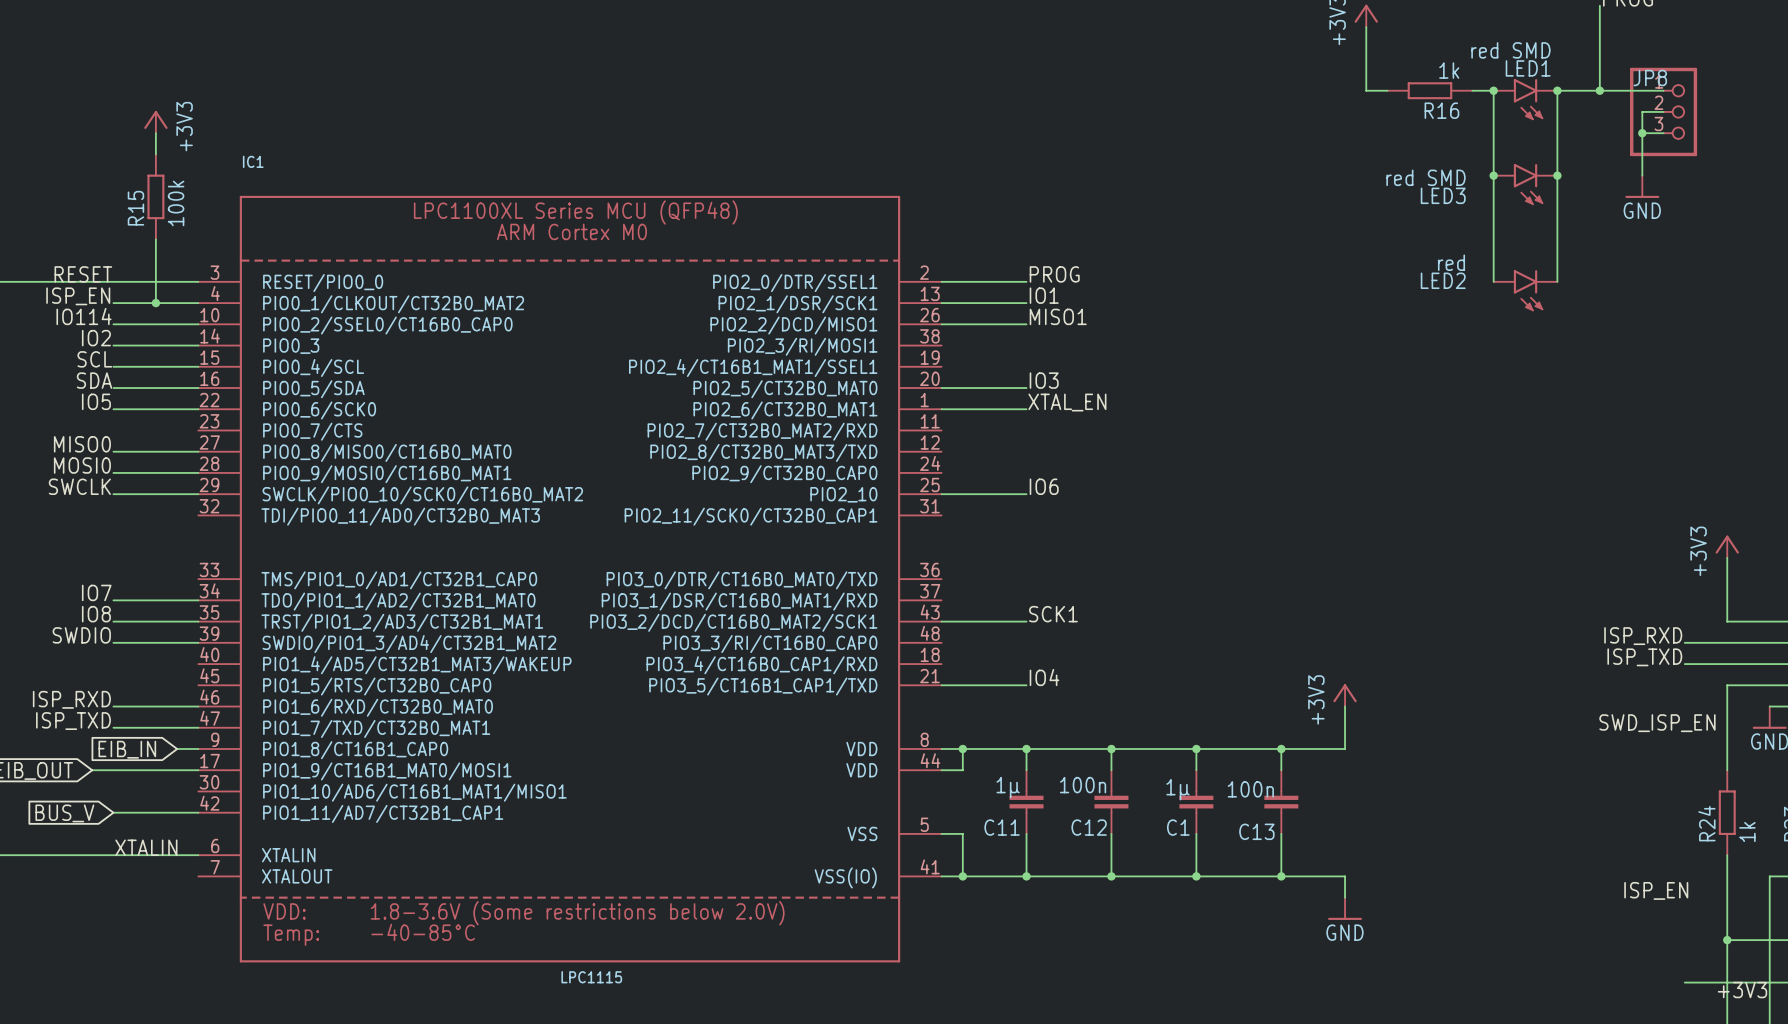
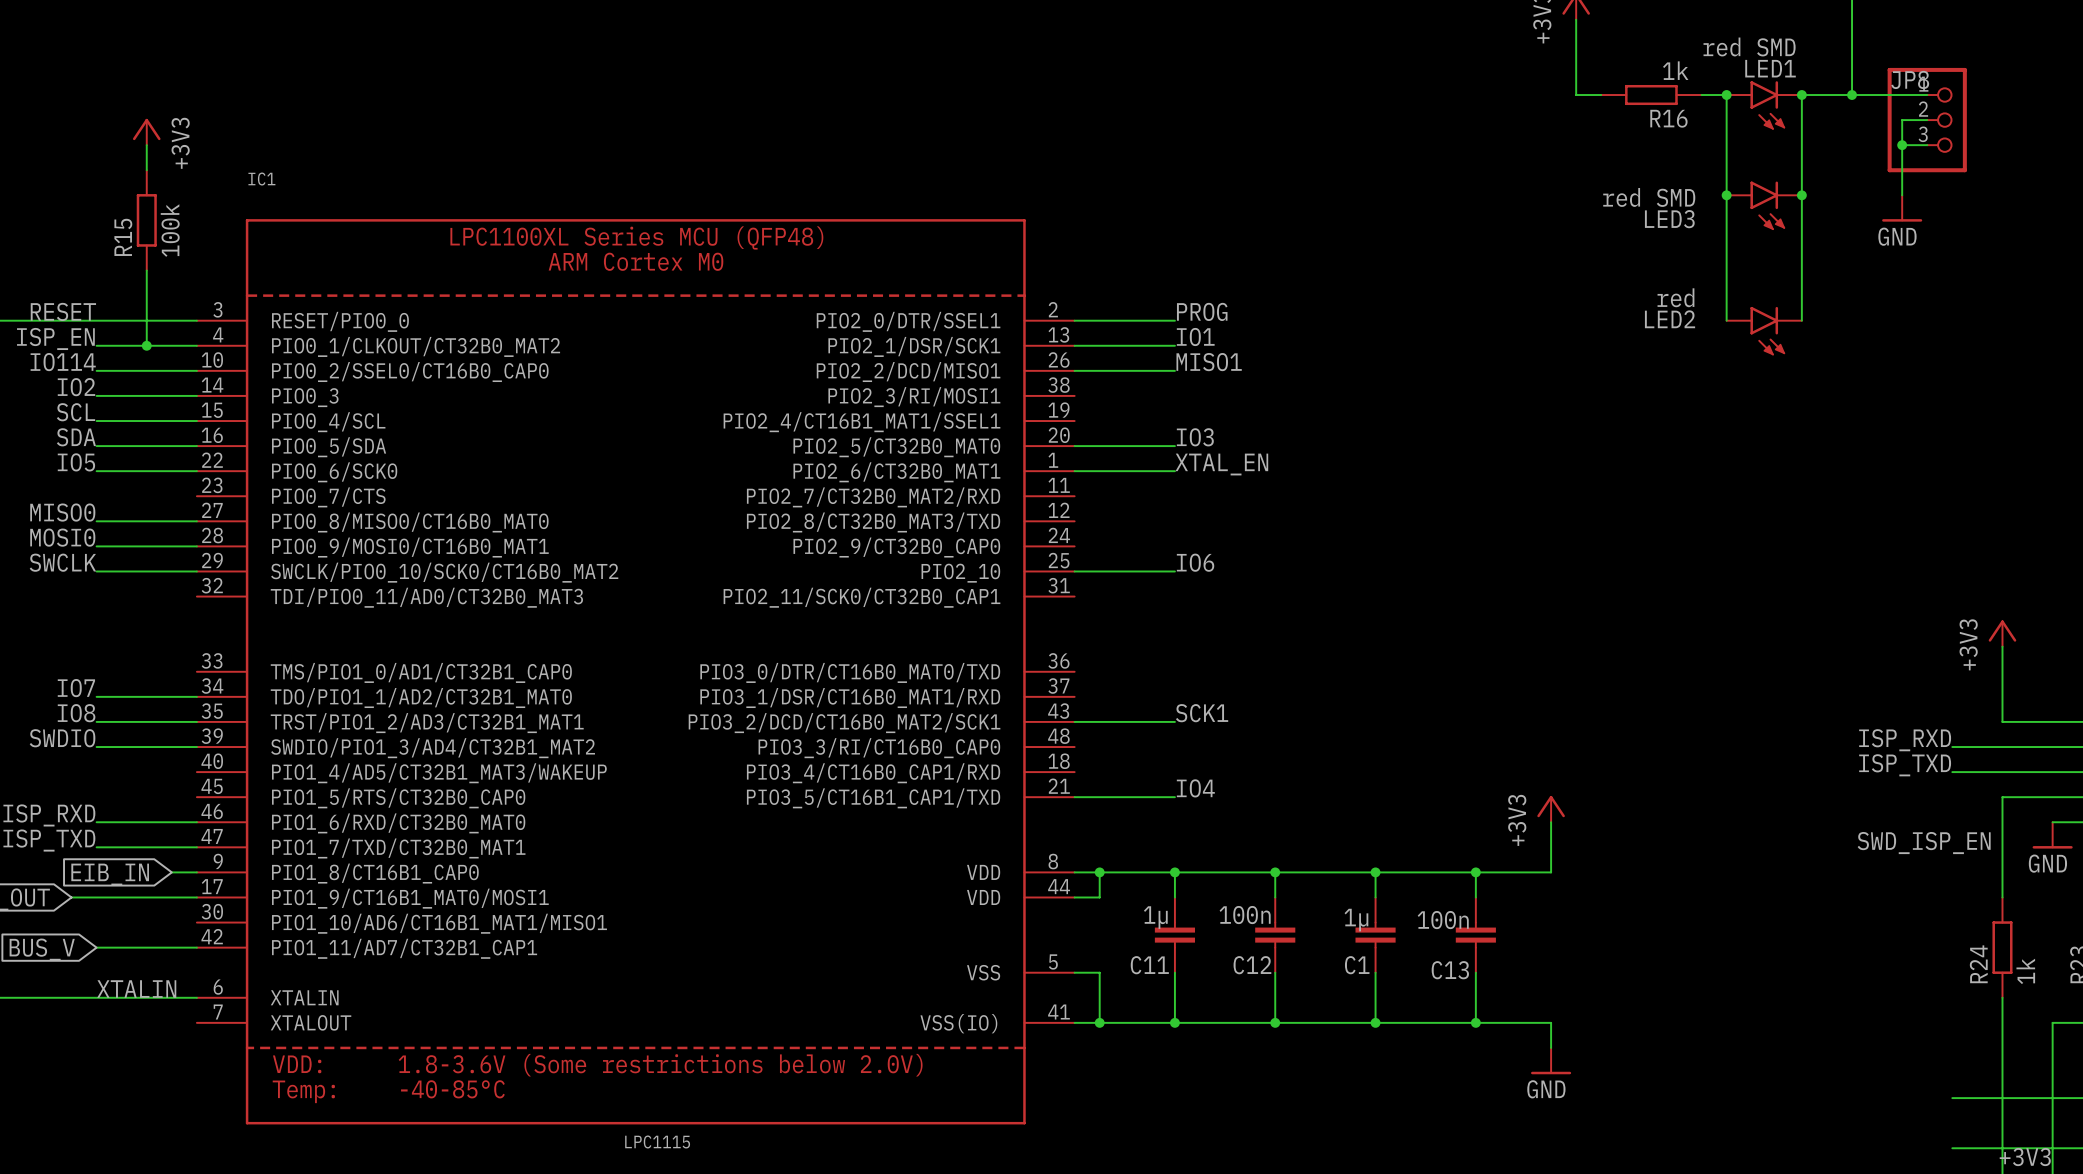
label: ISP_EN (1656, 890) -> none
wire: none -> (1952, 1098) (2002, 1098)
junction: (1727, 940) -> none

